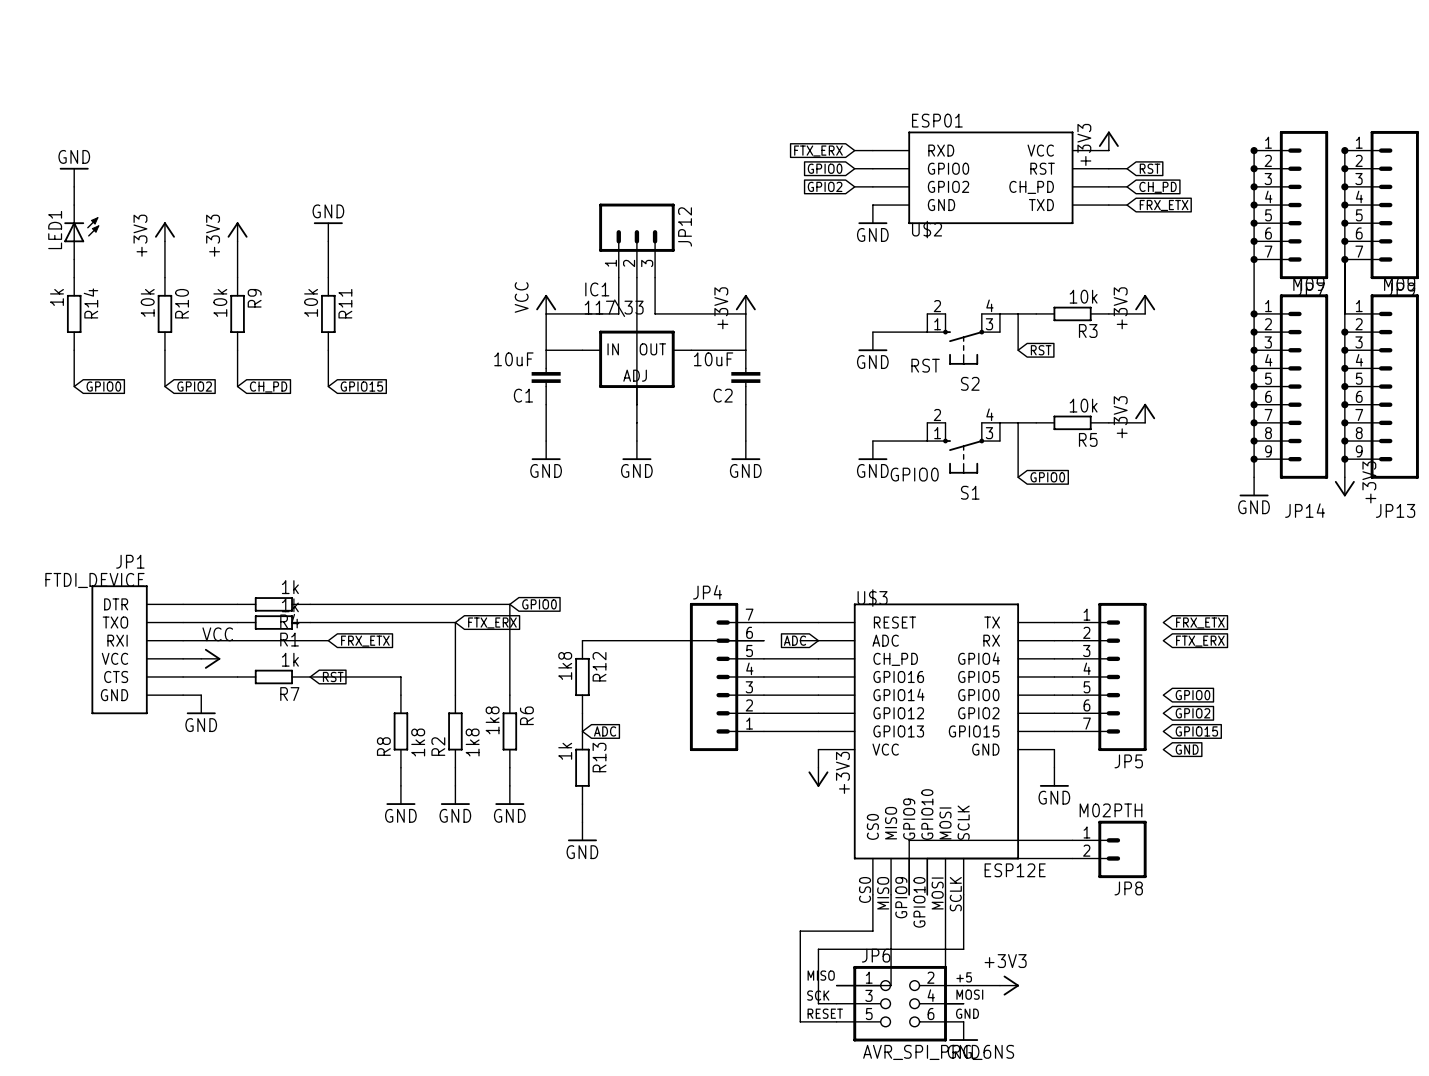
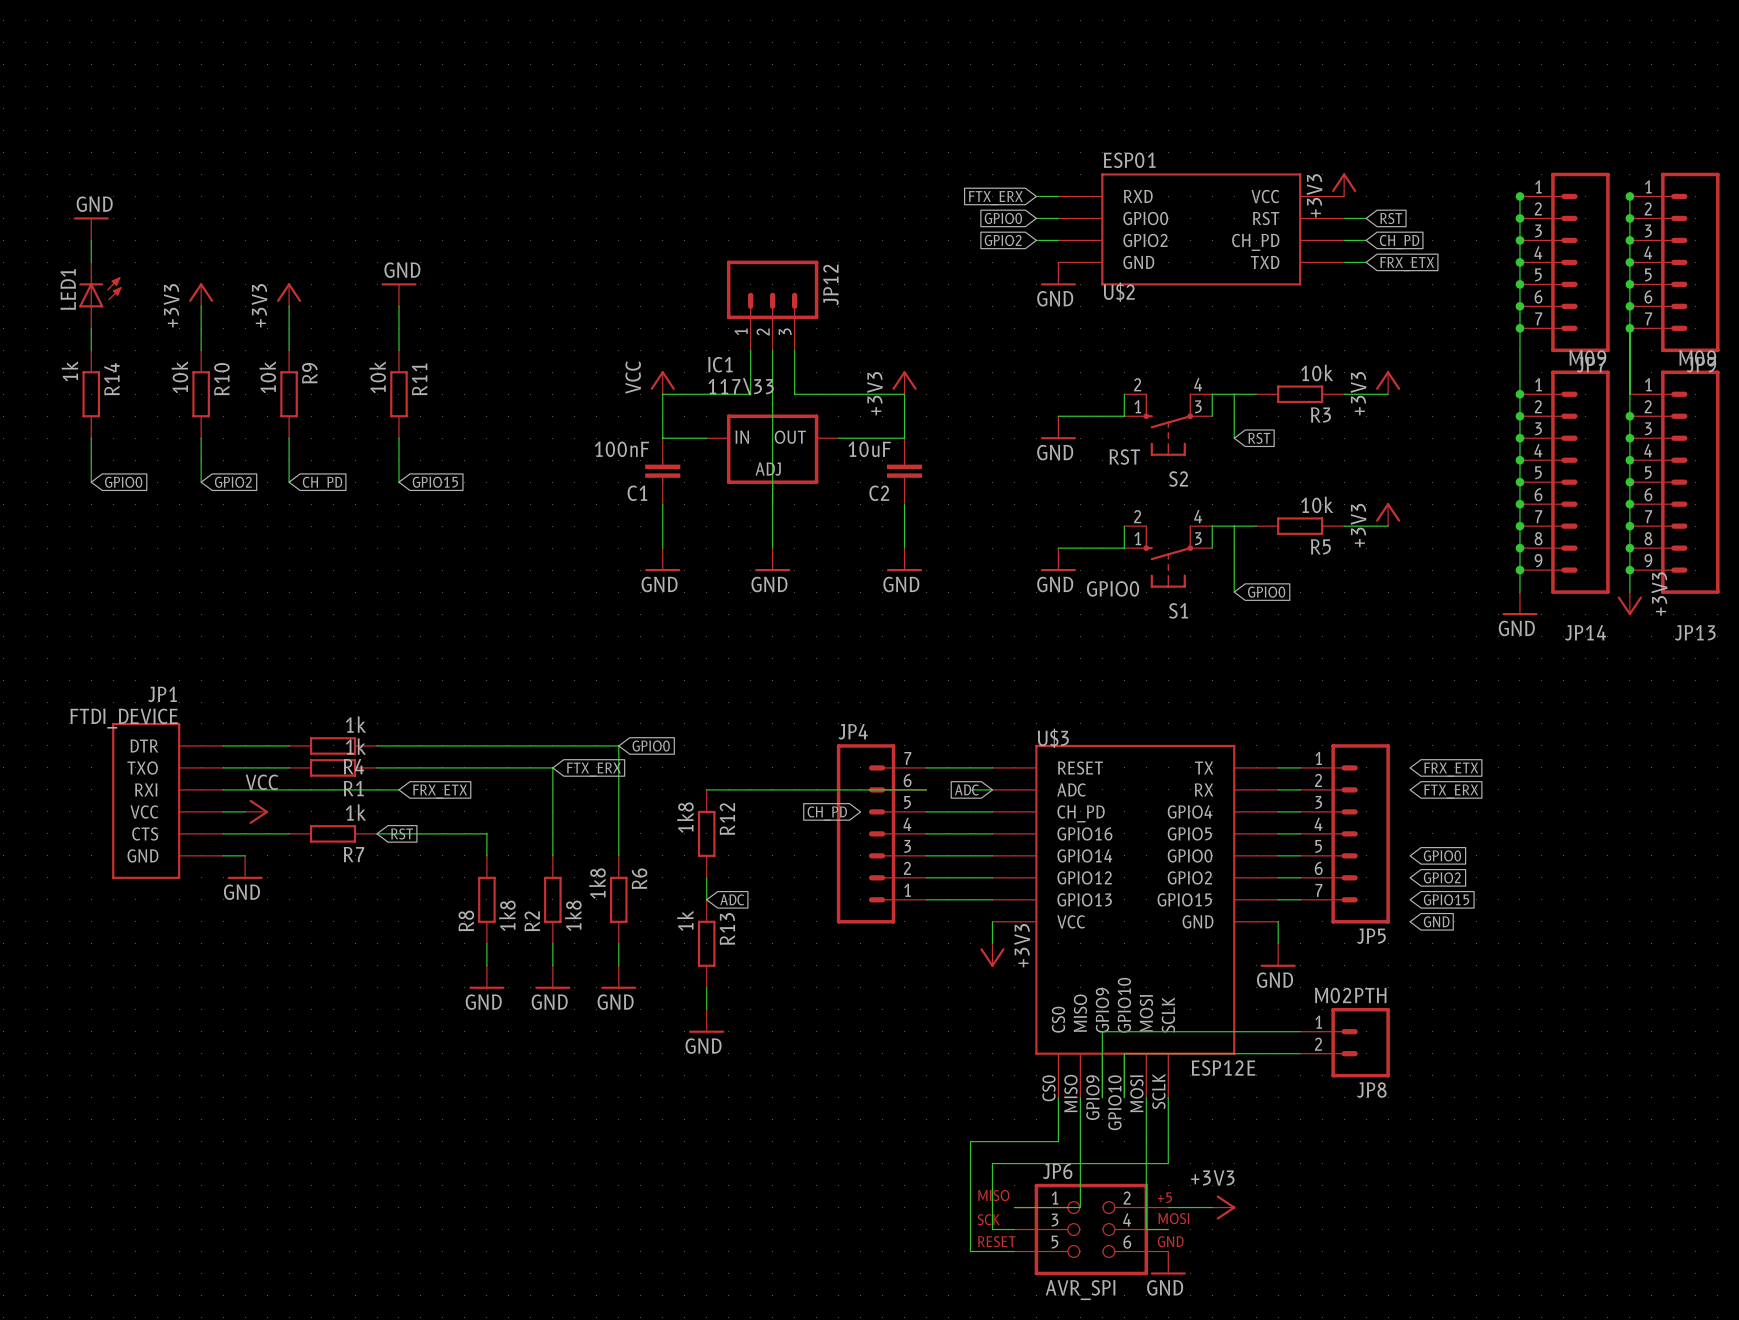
C1 value: 10uF (513, 359) -> 100nF (621, 449)
global label: none -> CH_PD (827, 813)
JP6 value: AVR_SPI_PRG_6NS (938, 1052) -> AVR_SPI (1080, 1290)

